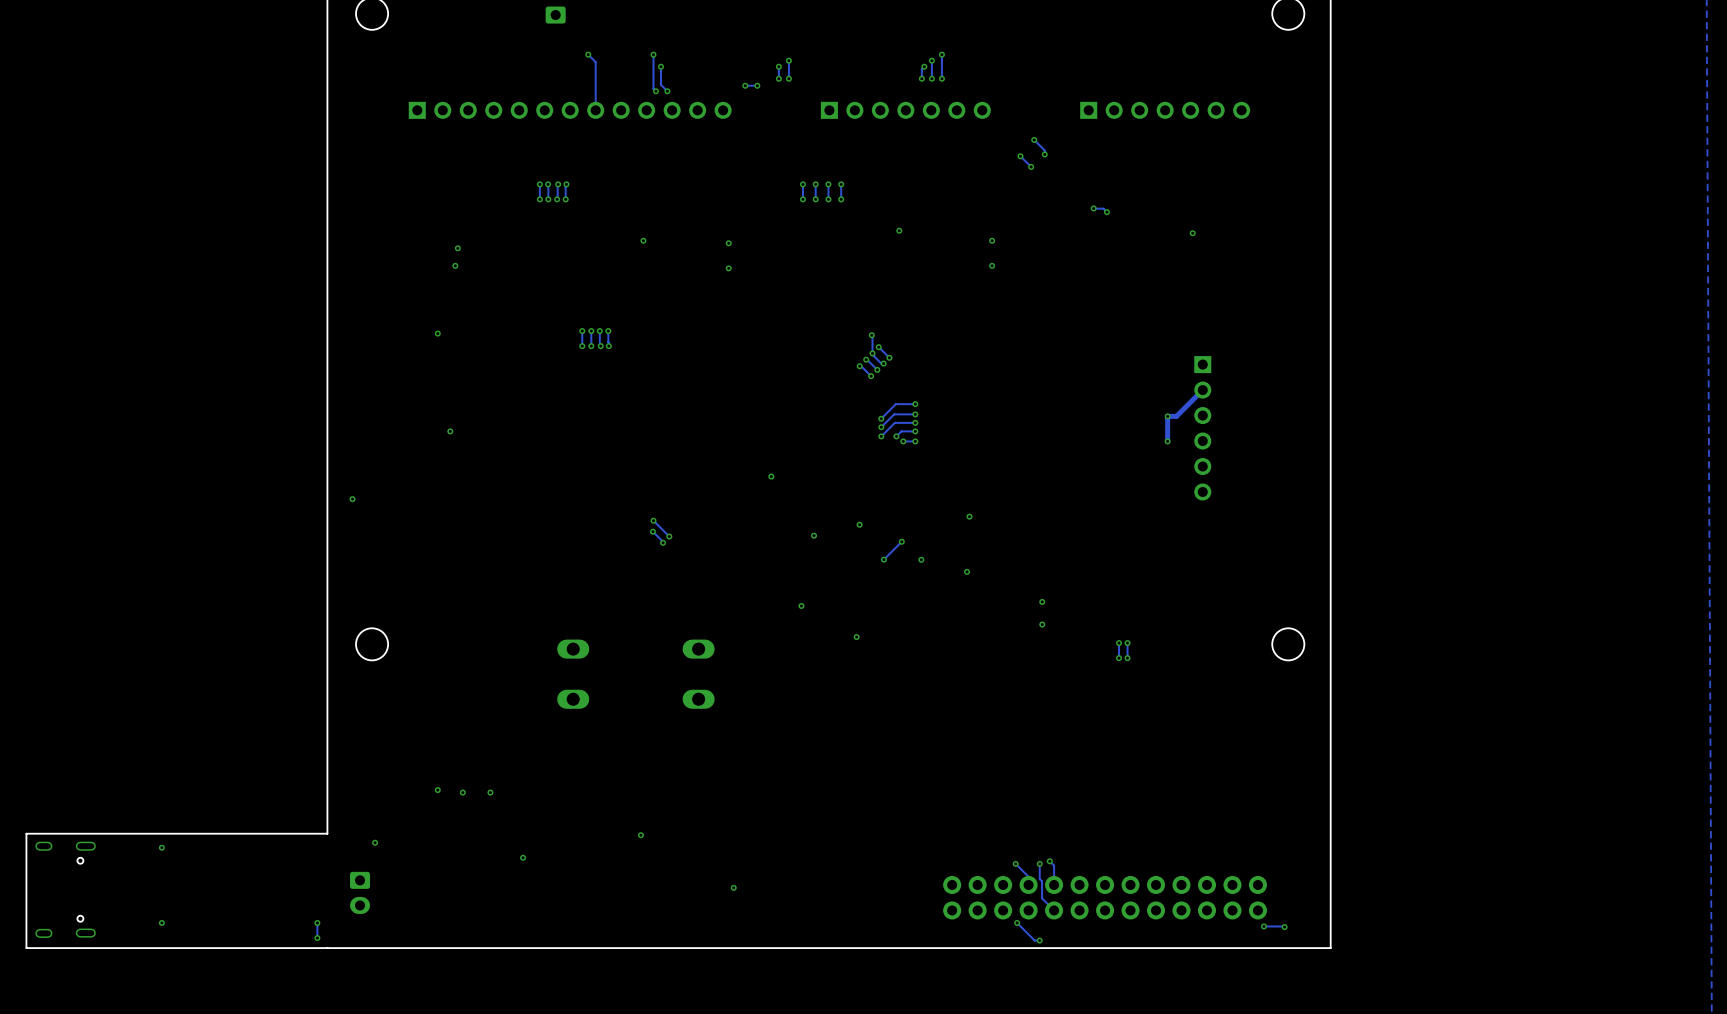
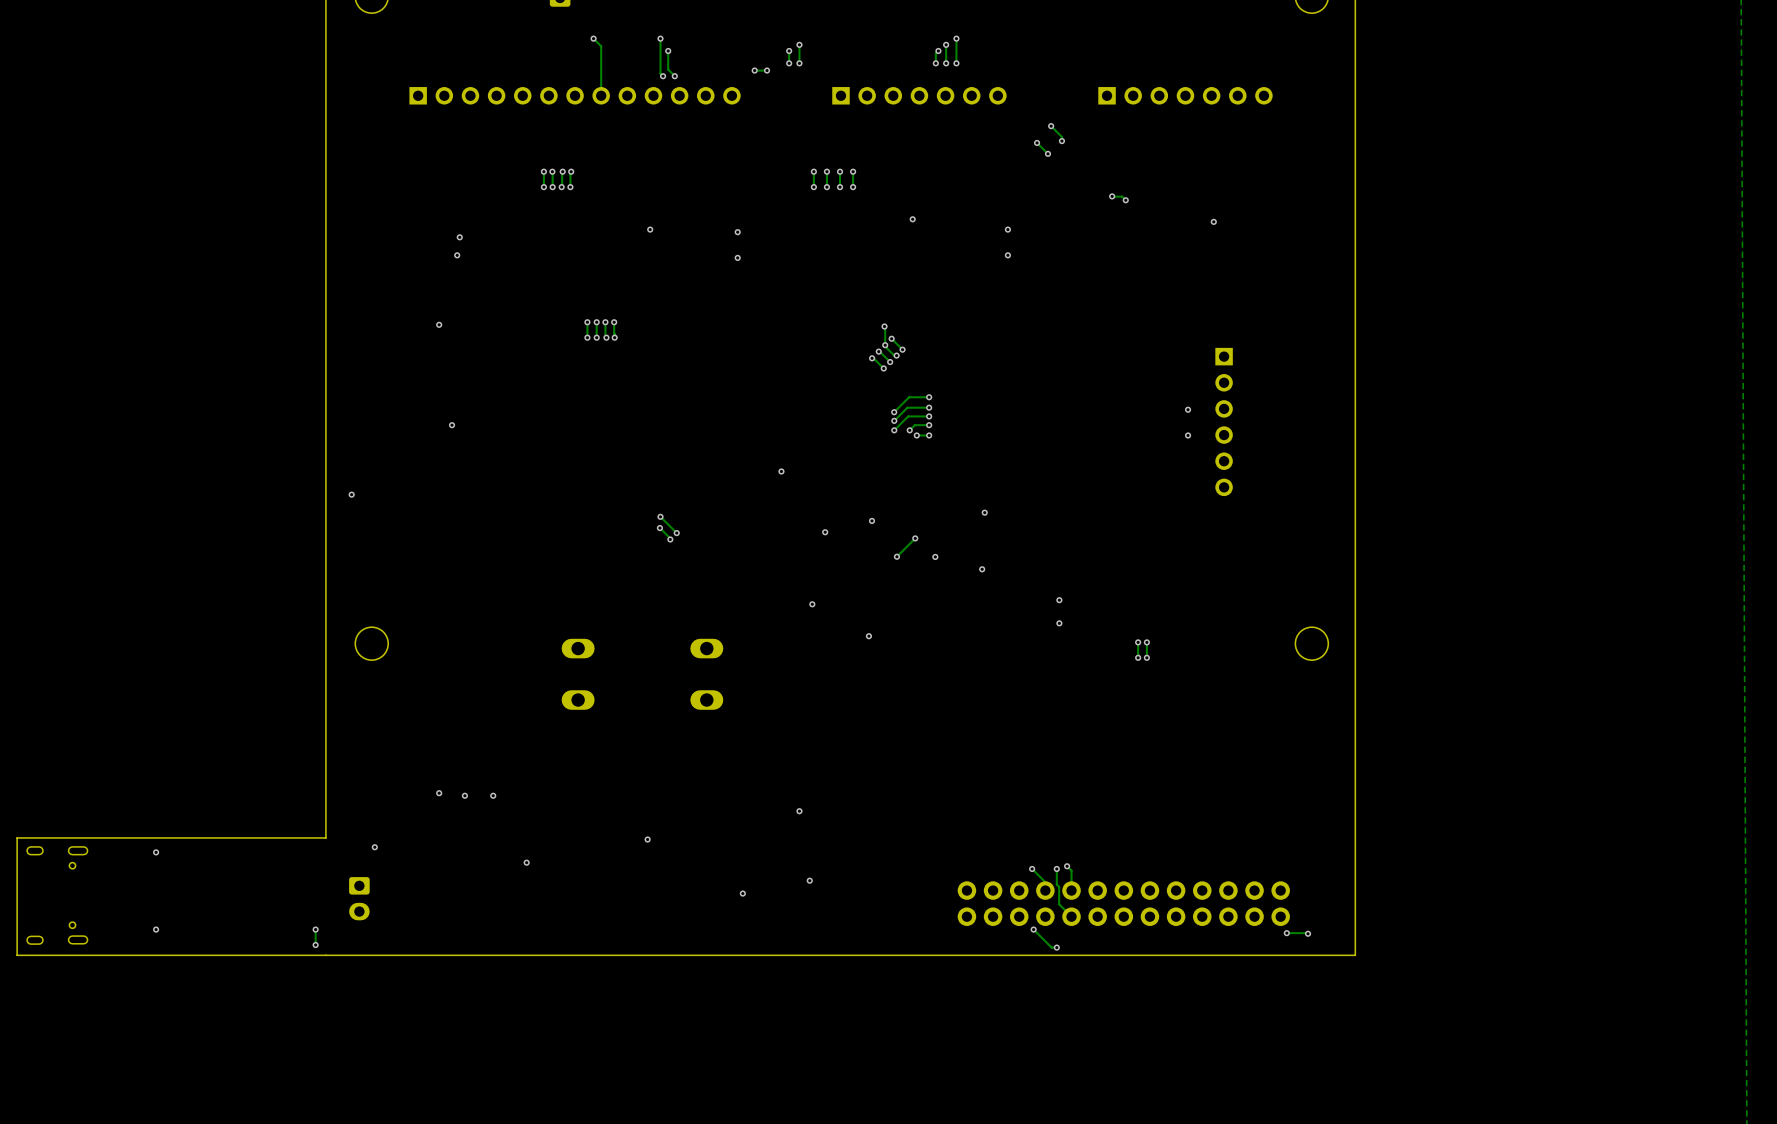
track: (1202, 390) (1176, 416) (1167, 416) (1167, 441) -> none
via: none -> (799, 811)
via: none -> (809, 880)

